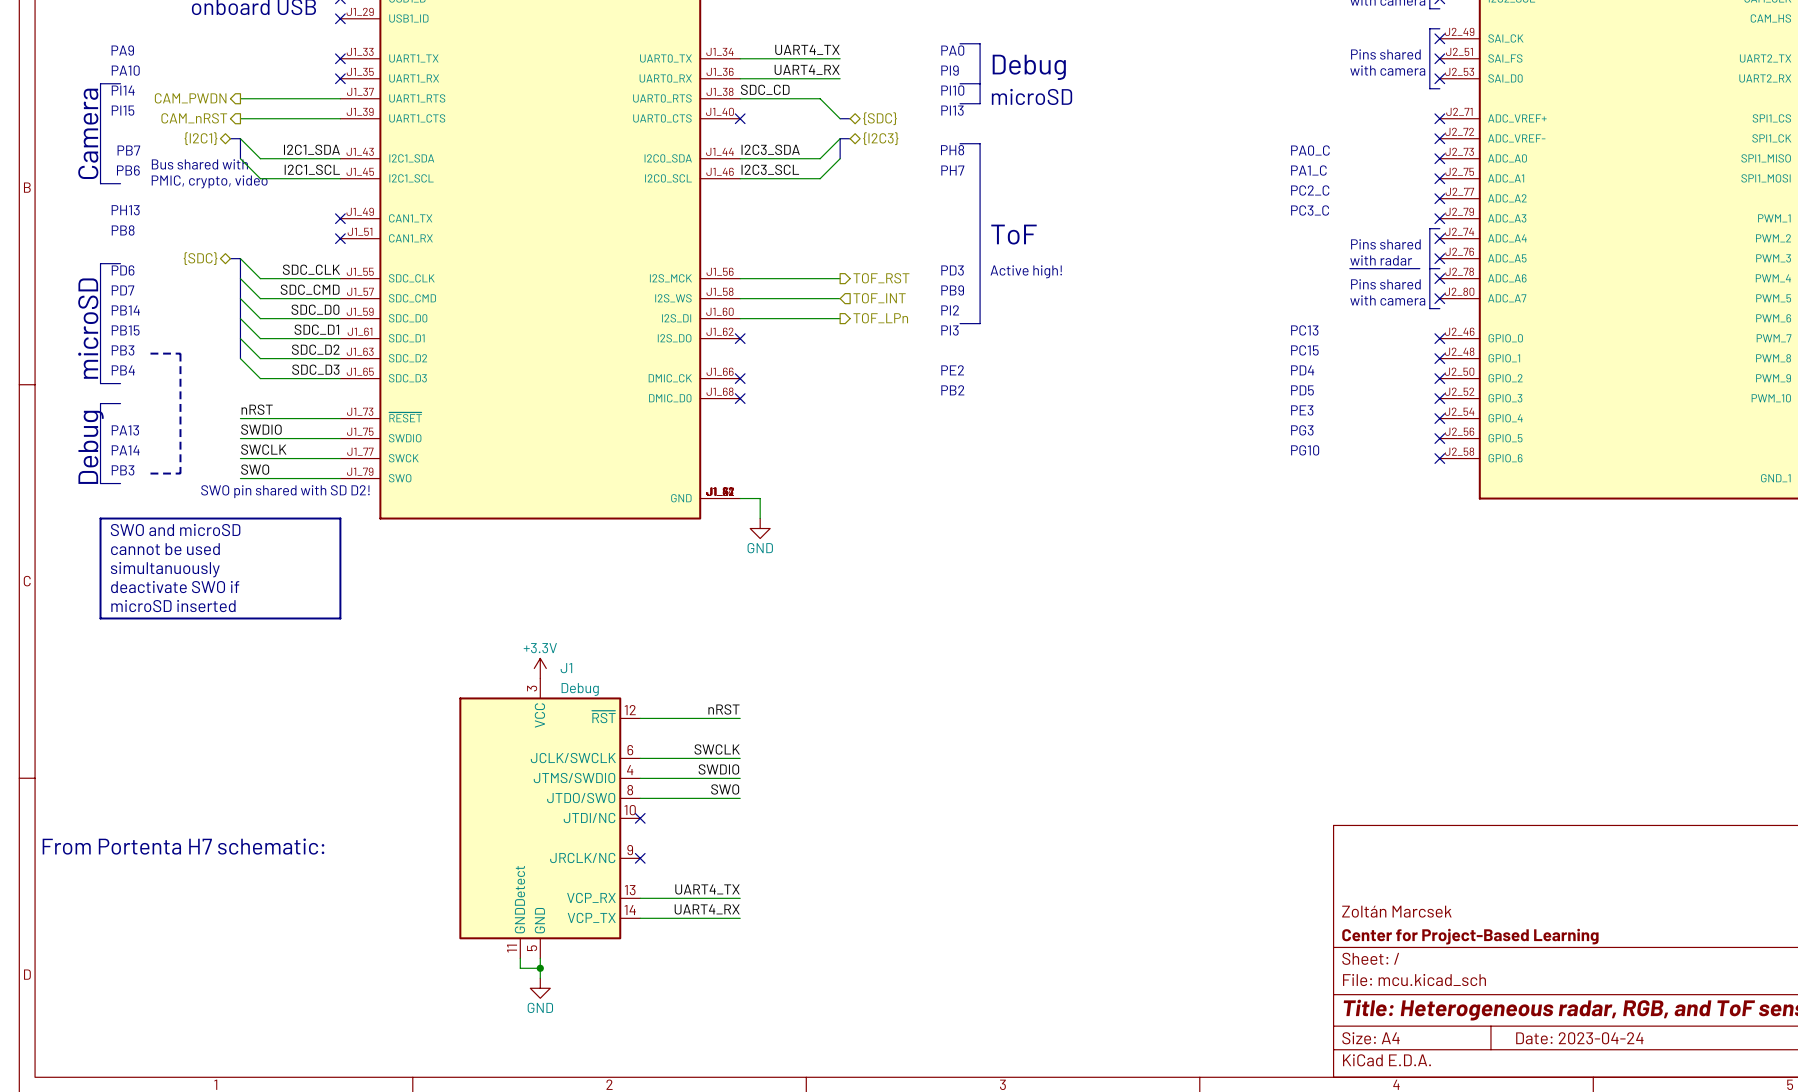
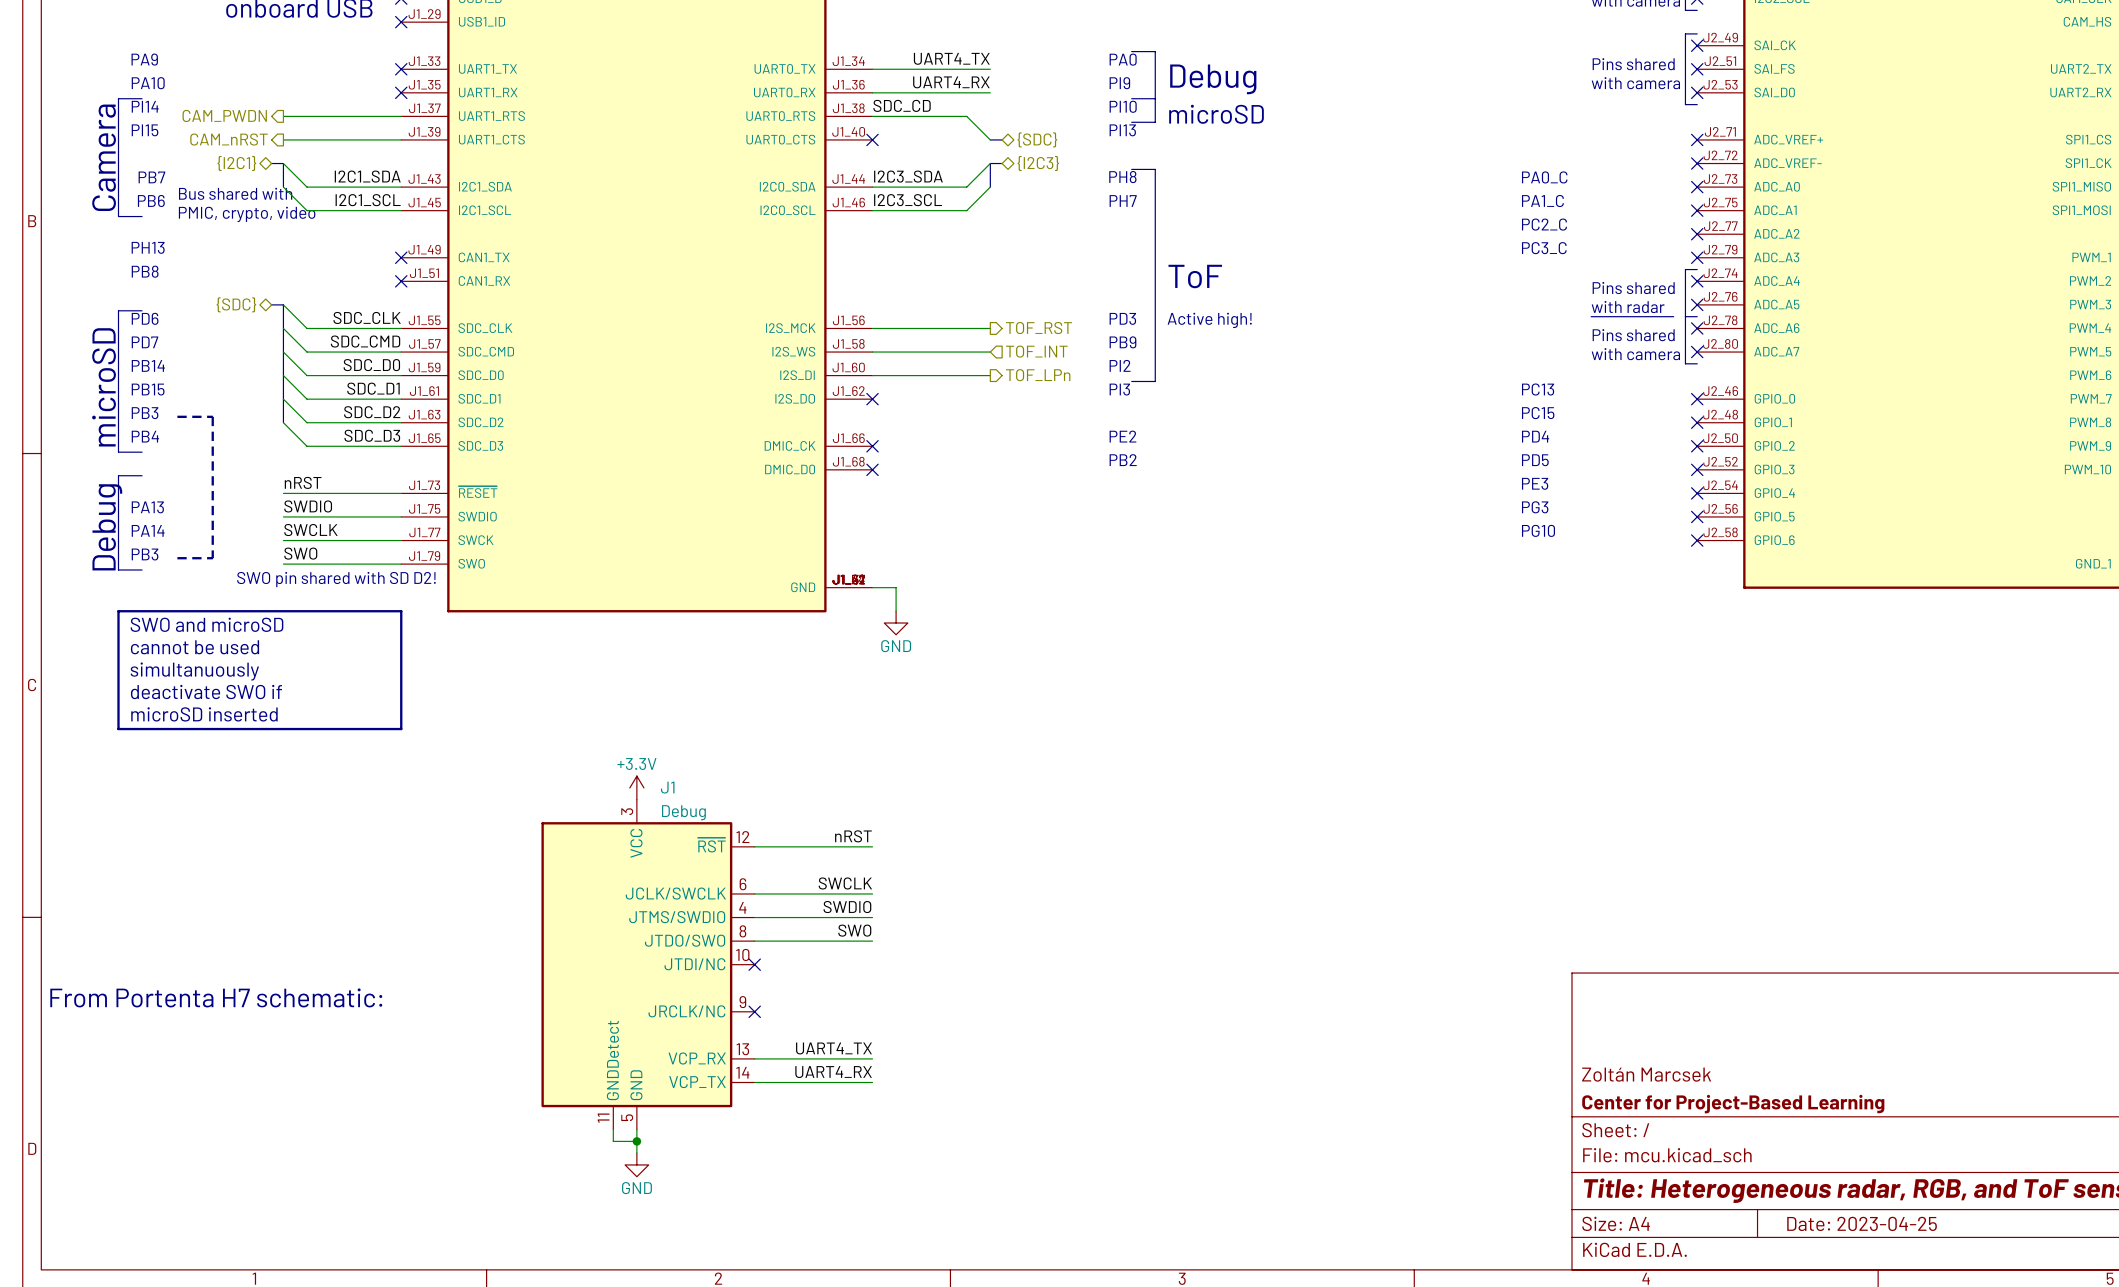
title block: Date: 2023-04-24 (1579, 1038) -> Date: 2023-04-25 (1862, 1223)

